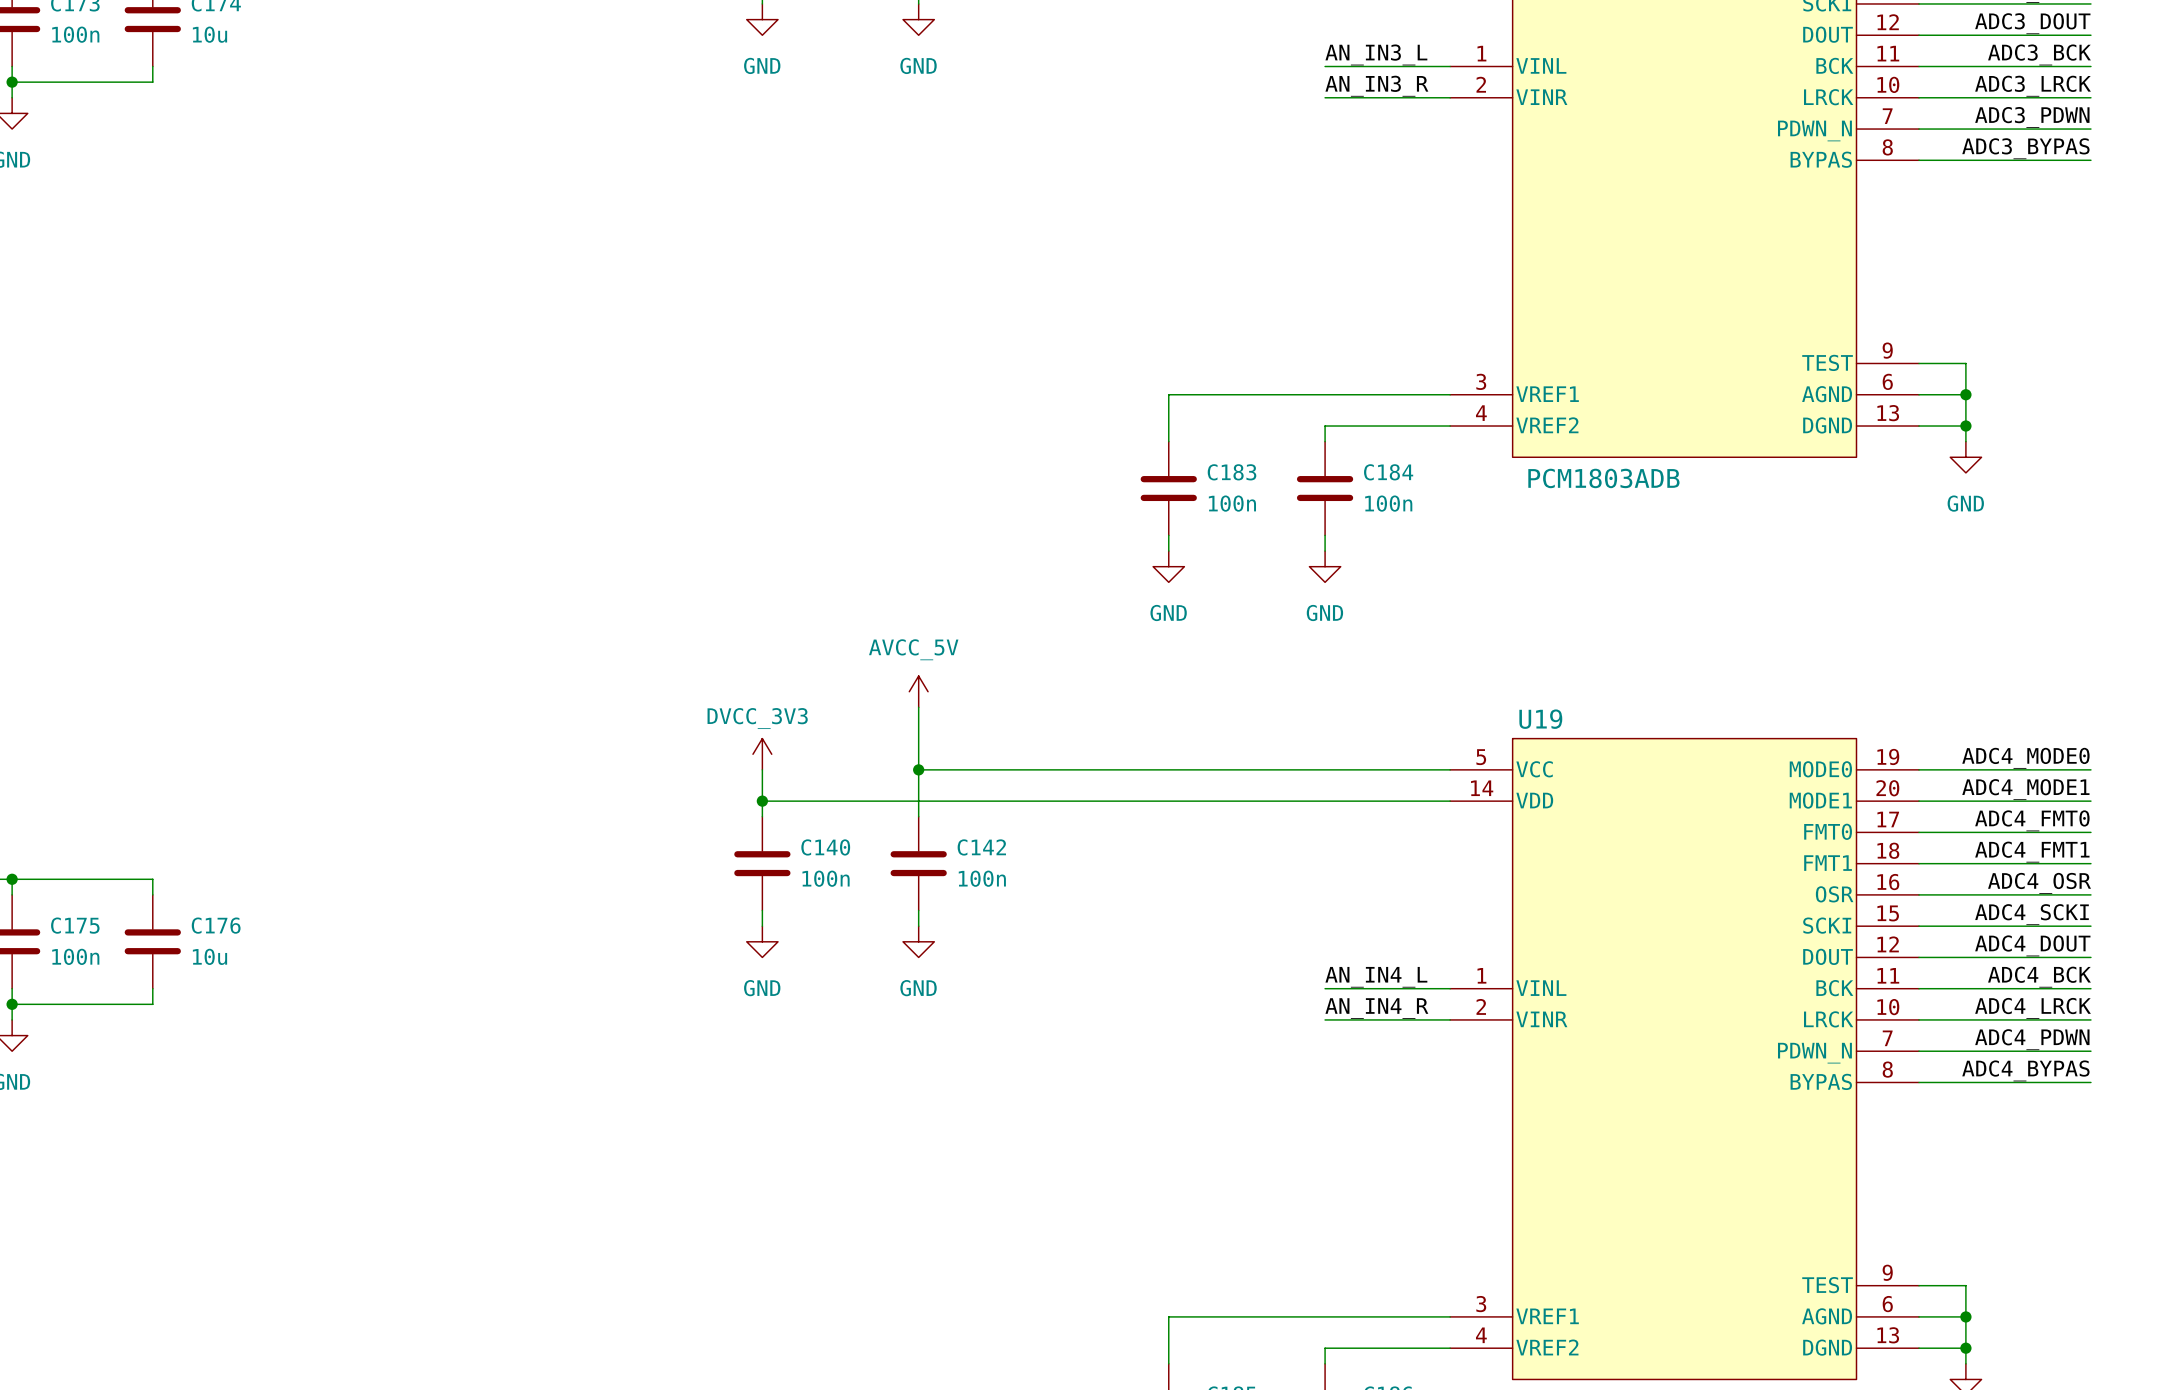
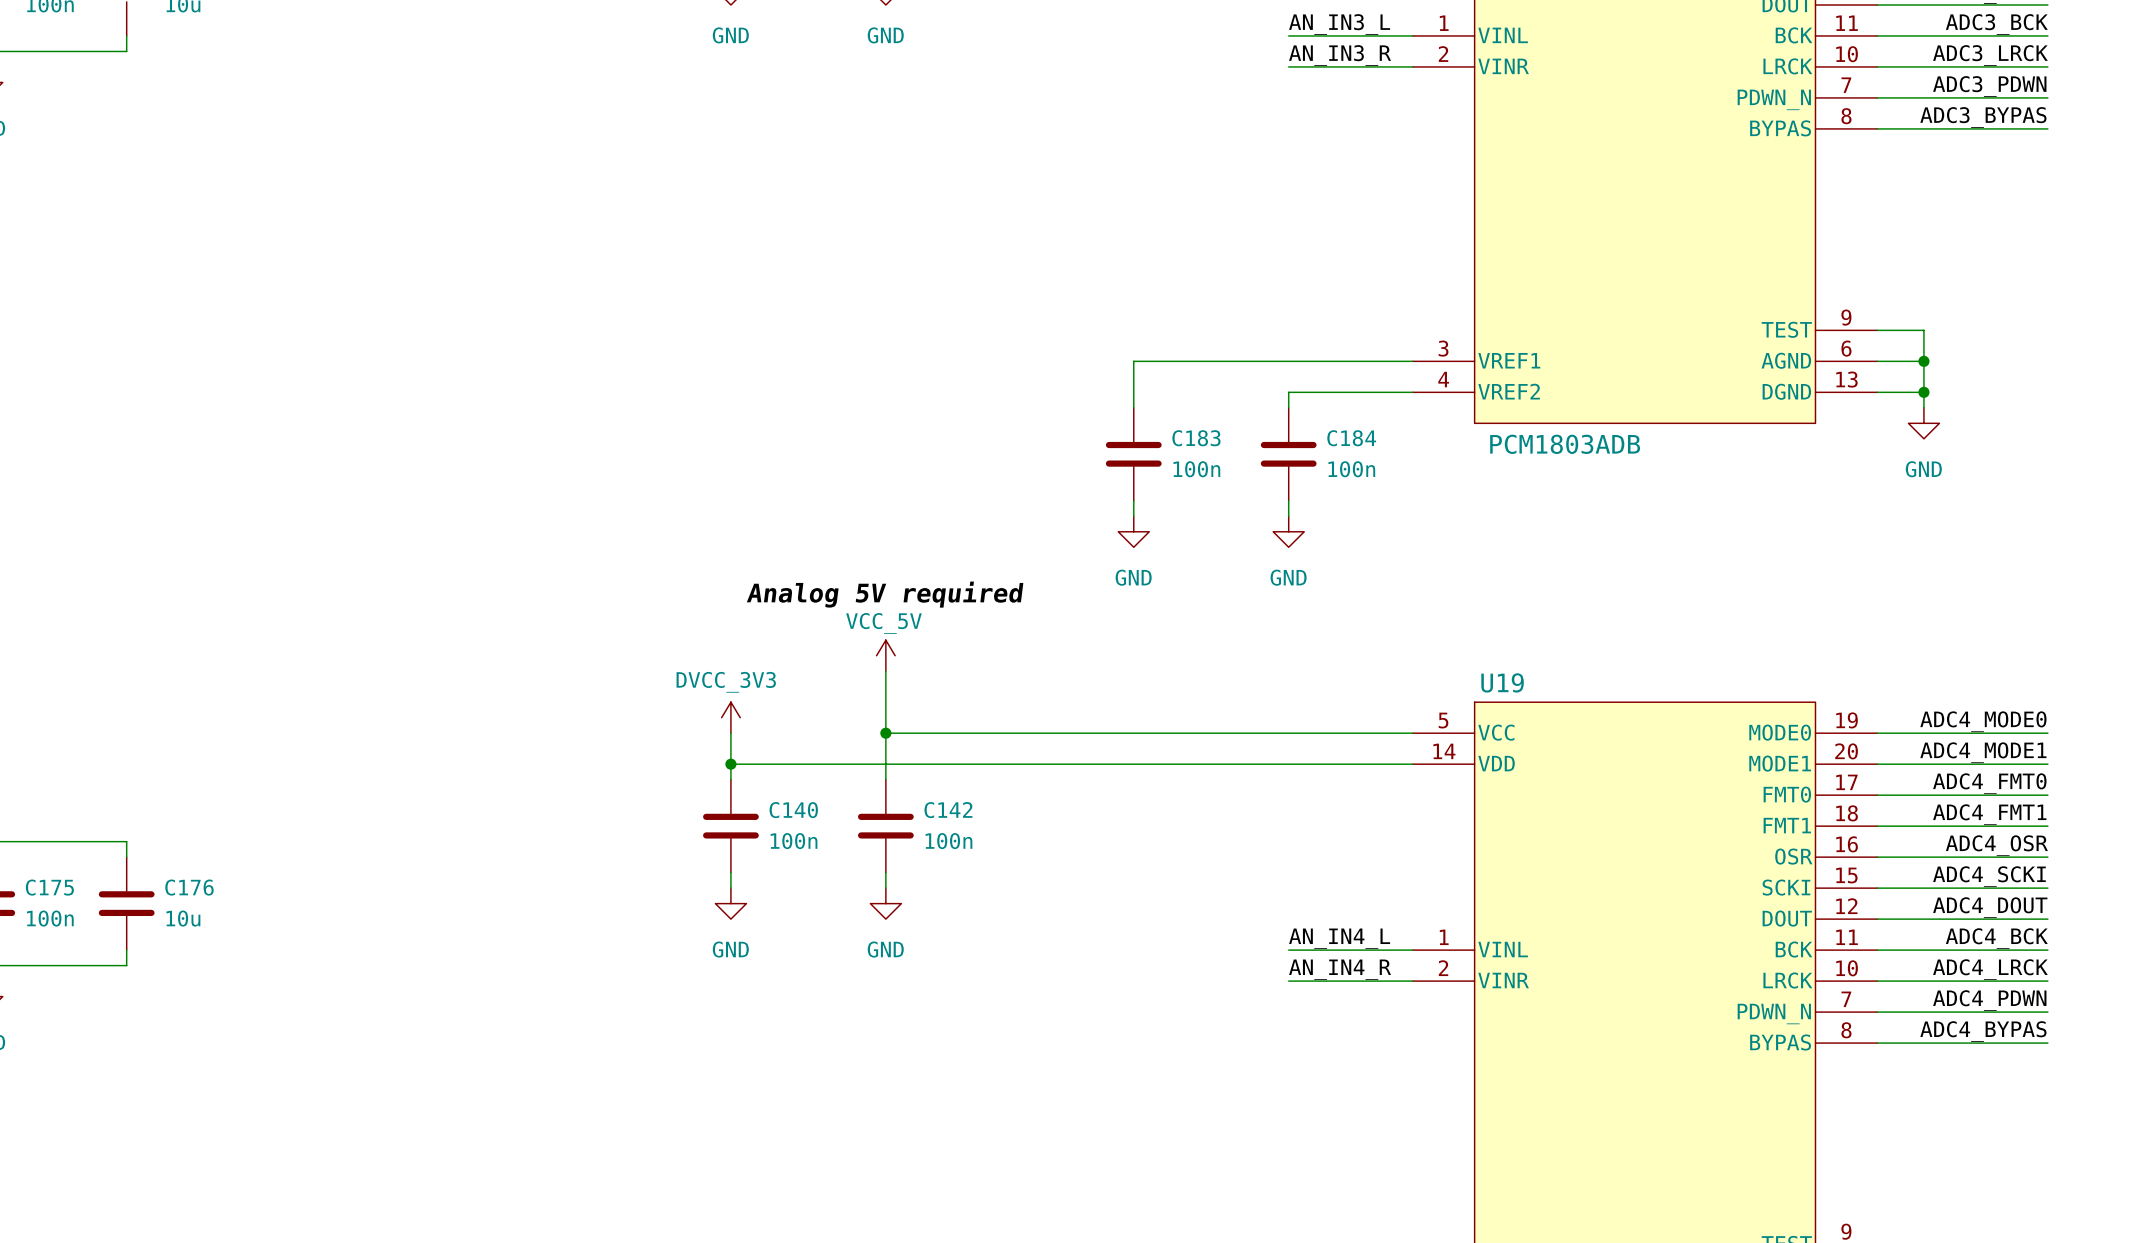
label: none -> Analog 5V required (885, 594)
power symbol: AVCC_5V (918, 691) -> VCC_5V (885, 655)

